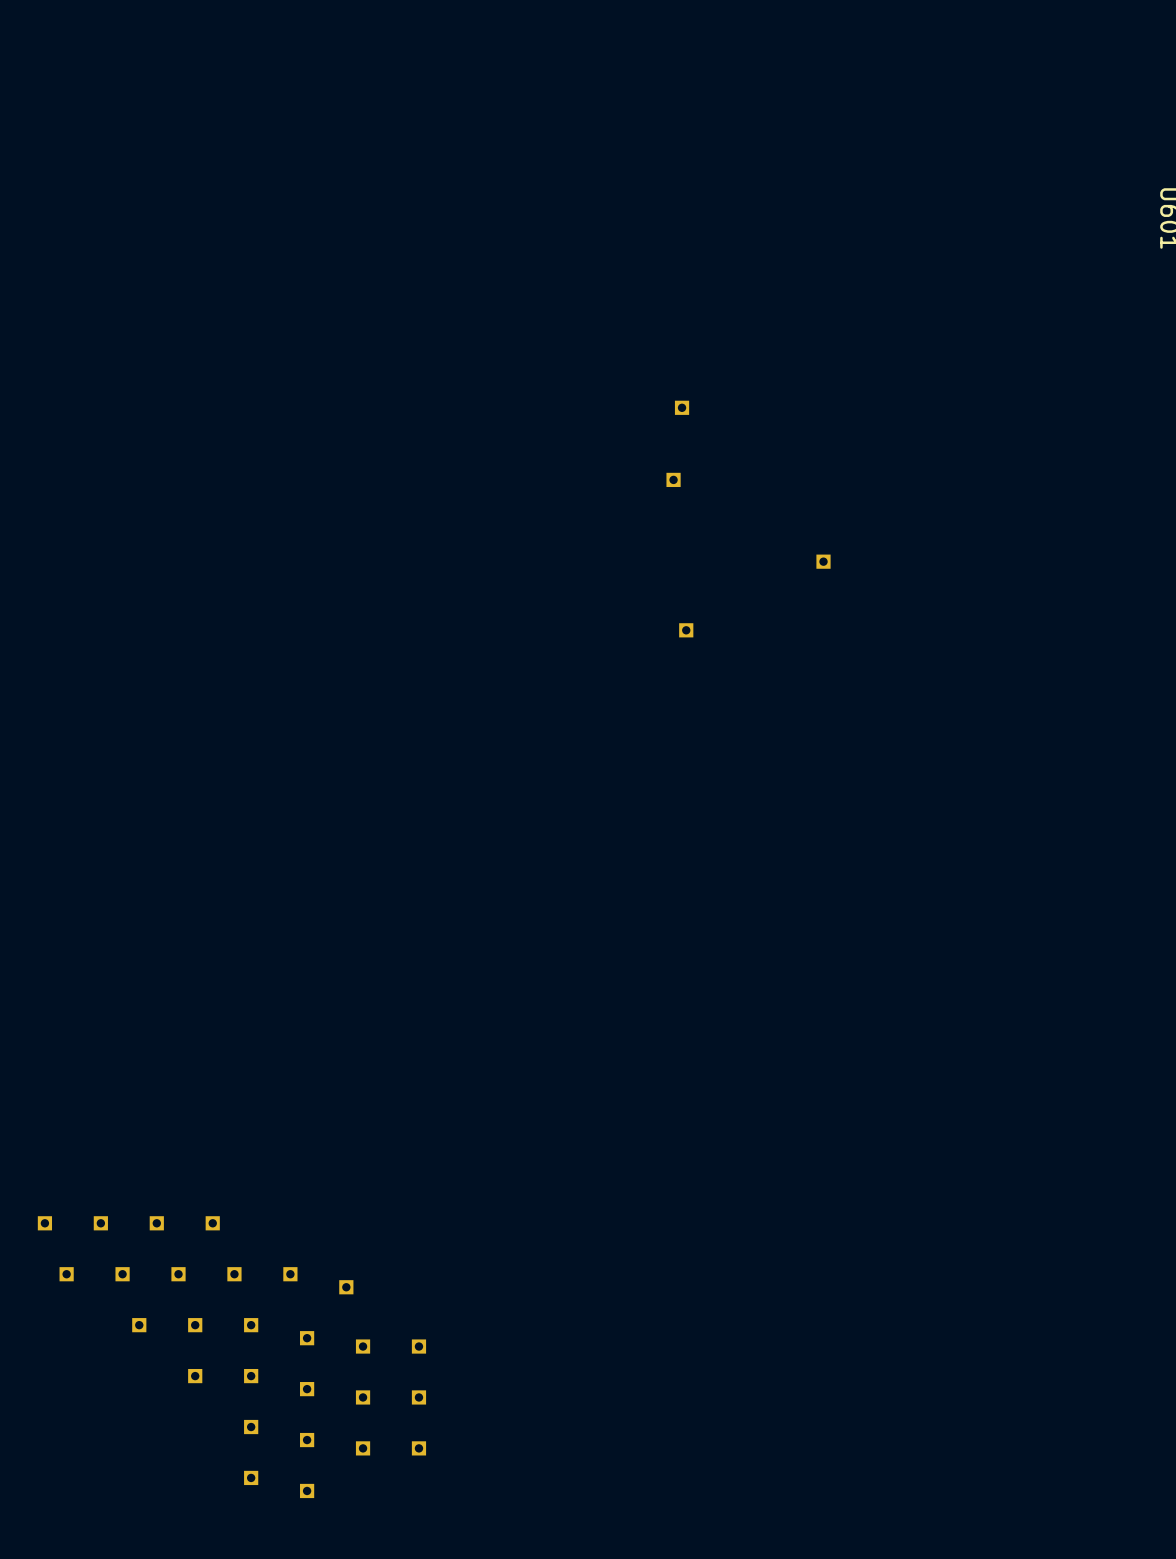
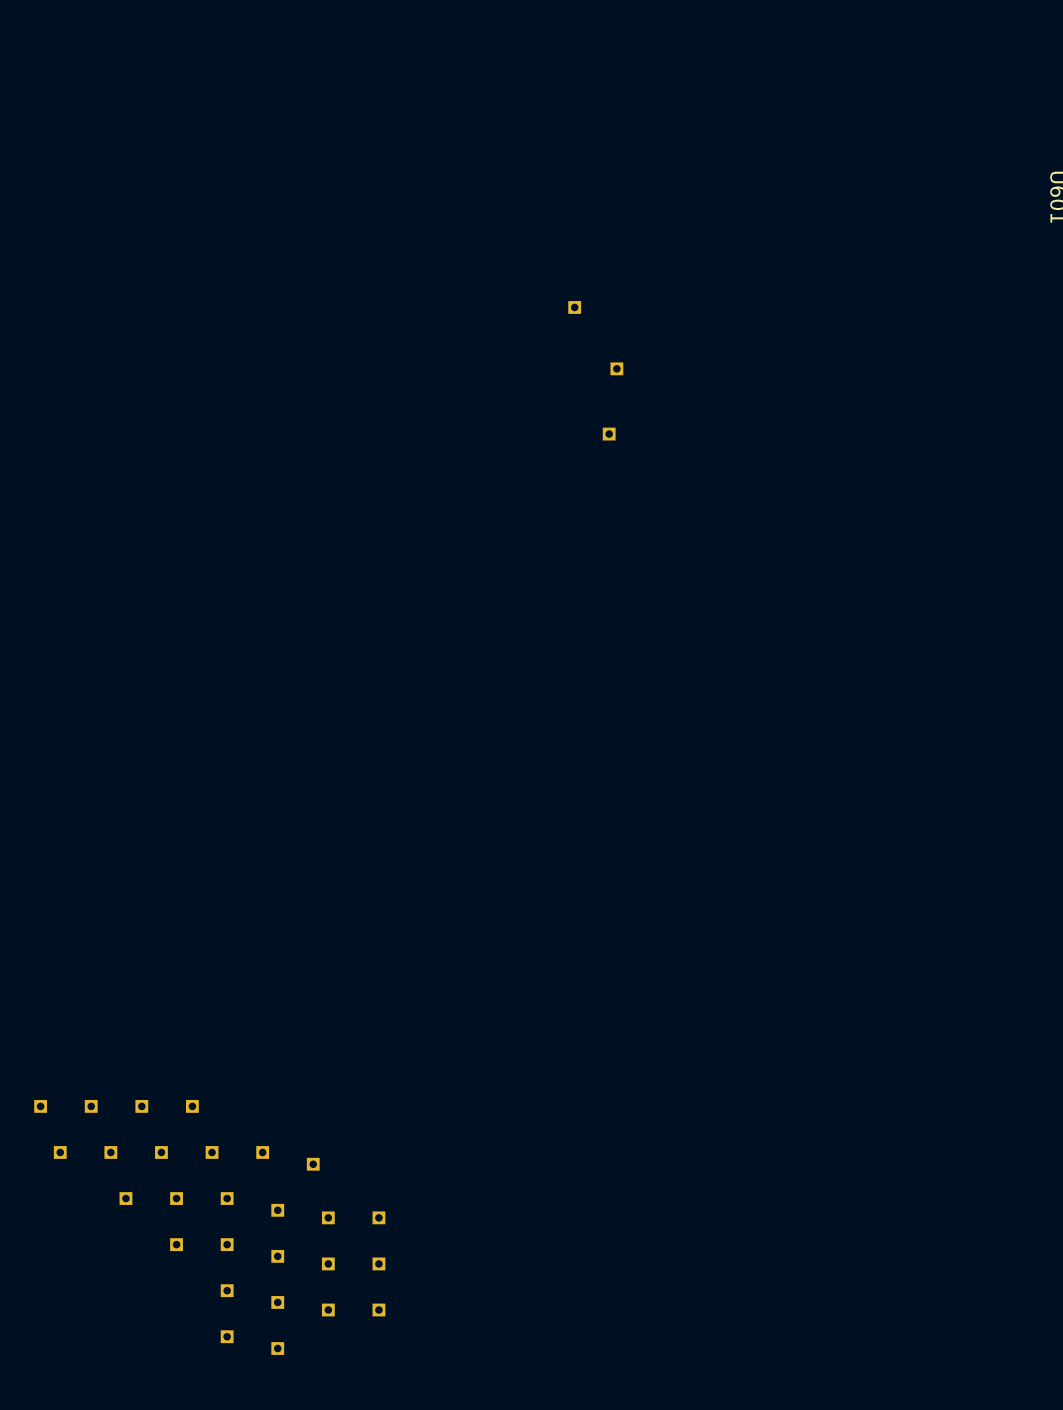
part: none -> (574, 307)
part: (823, 561) -> none
part: (686, 630) -> none

